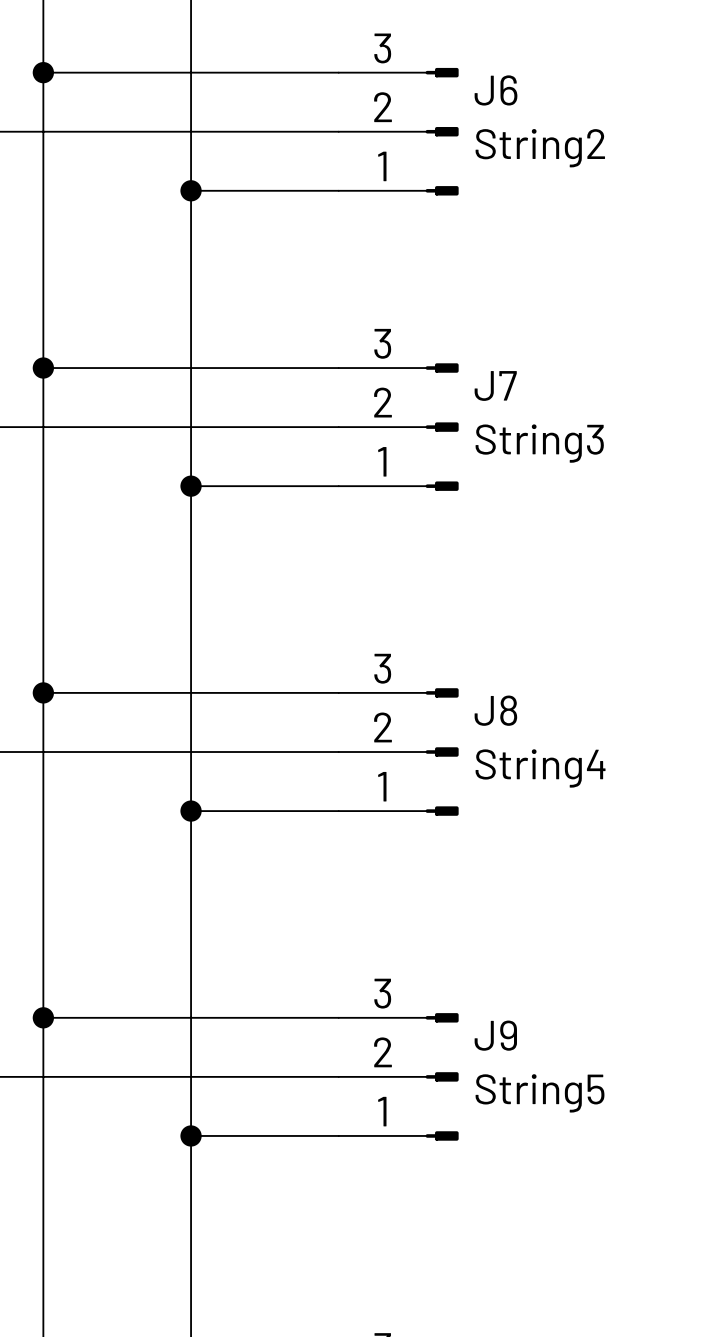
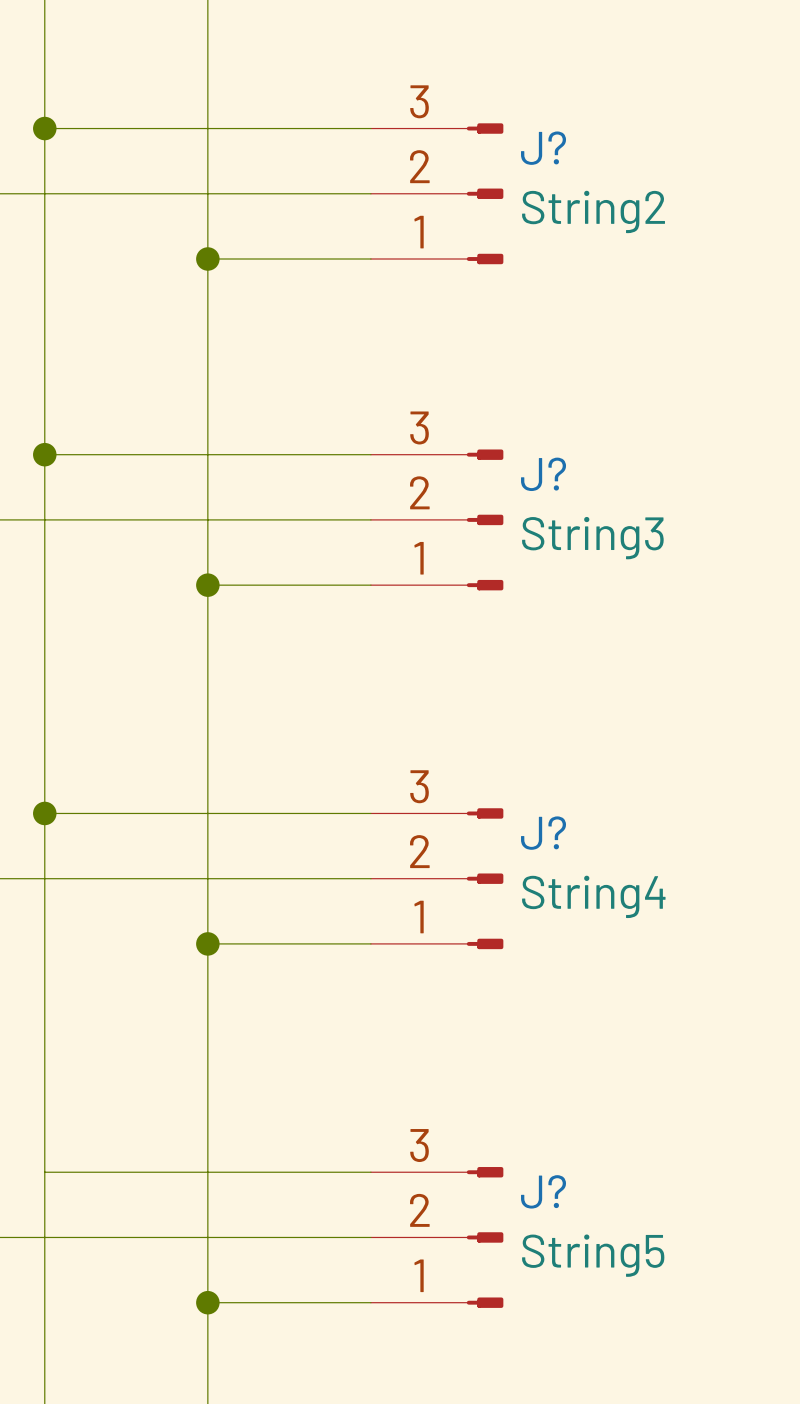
J6 name: J6 (496, 90) -> J? (543, 148)
J7 name: J7 (495, 385) -> J? (543, 474)
J8 name: J8 (495, 710) -> J? (543, 833)
junction: (43, 1017) -> none
J9 name: J9 (495, 1035) -> J? (543, 1191)

